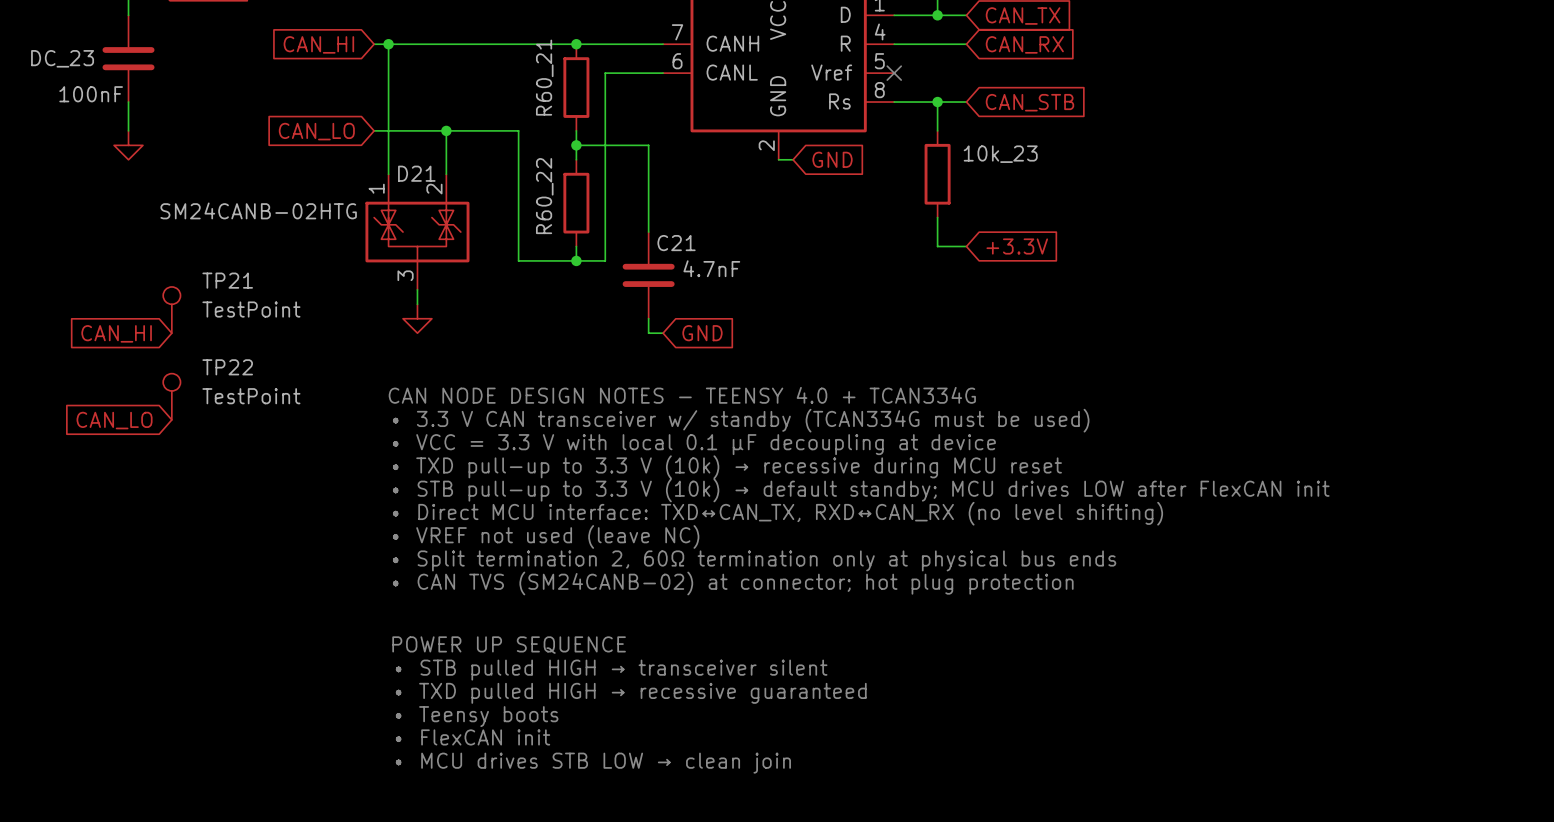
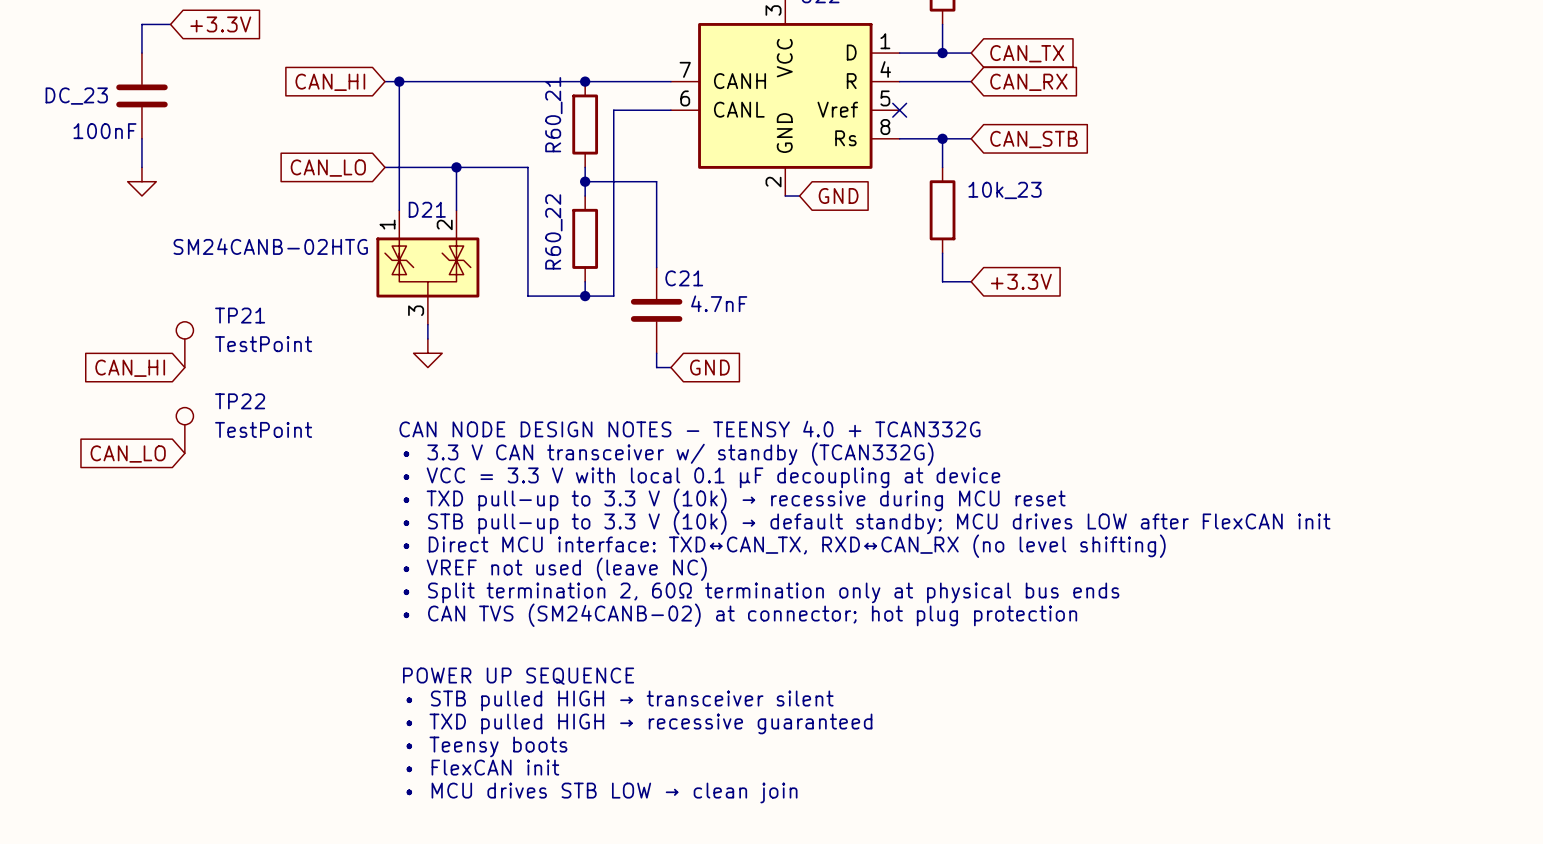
text: CAN NODE DESIGN NOTES - TEENSY 4.0 + TCAN334G (682, 395) -> CAN NODE DESIGN NOTES - TEENSY 4.0 + TCAN332G (689, 429)
text: • 3.3 V CAN transceiver w/ standby (TCAN334G must be used) (741, 420) -> • 3.3 V CAN transceiver w/ standby (TCAN332G) (668, 454)

